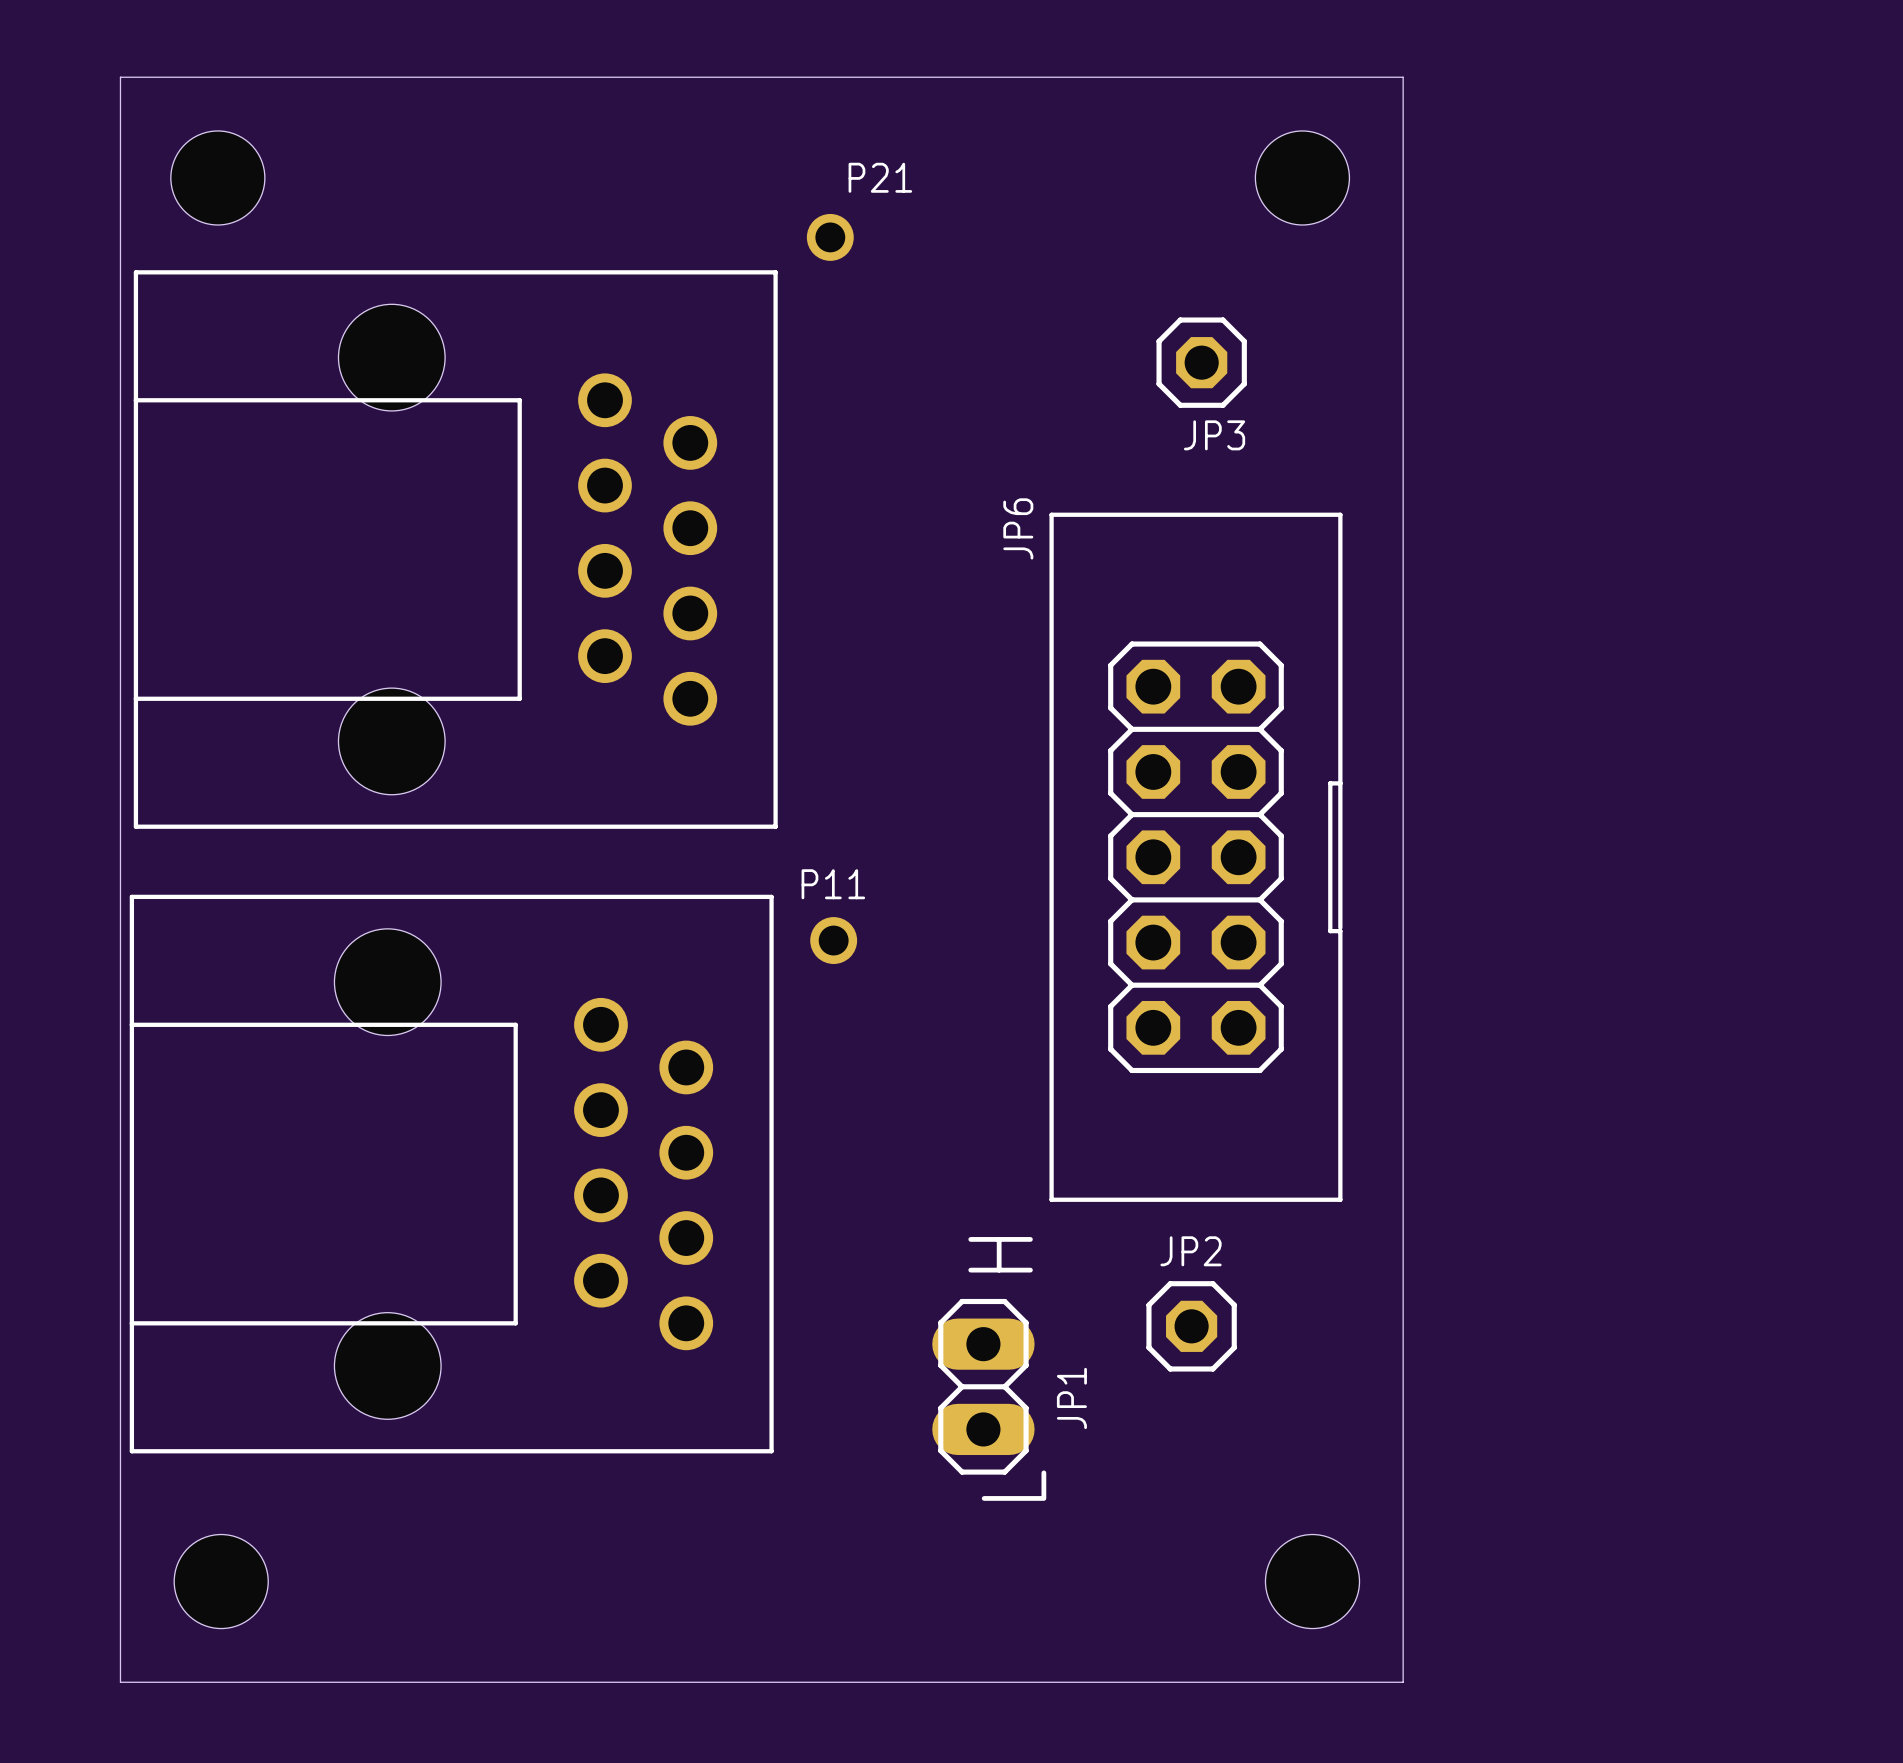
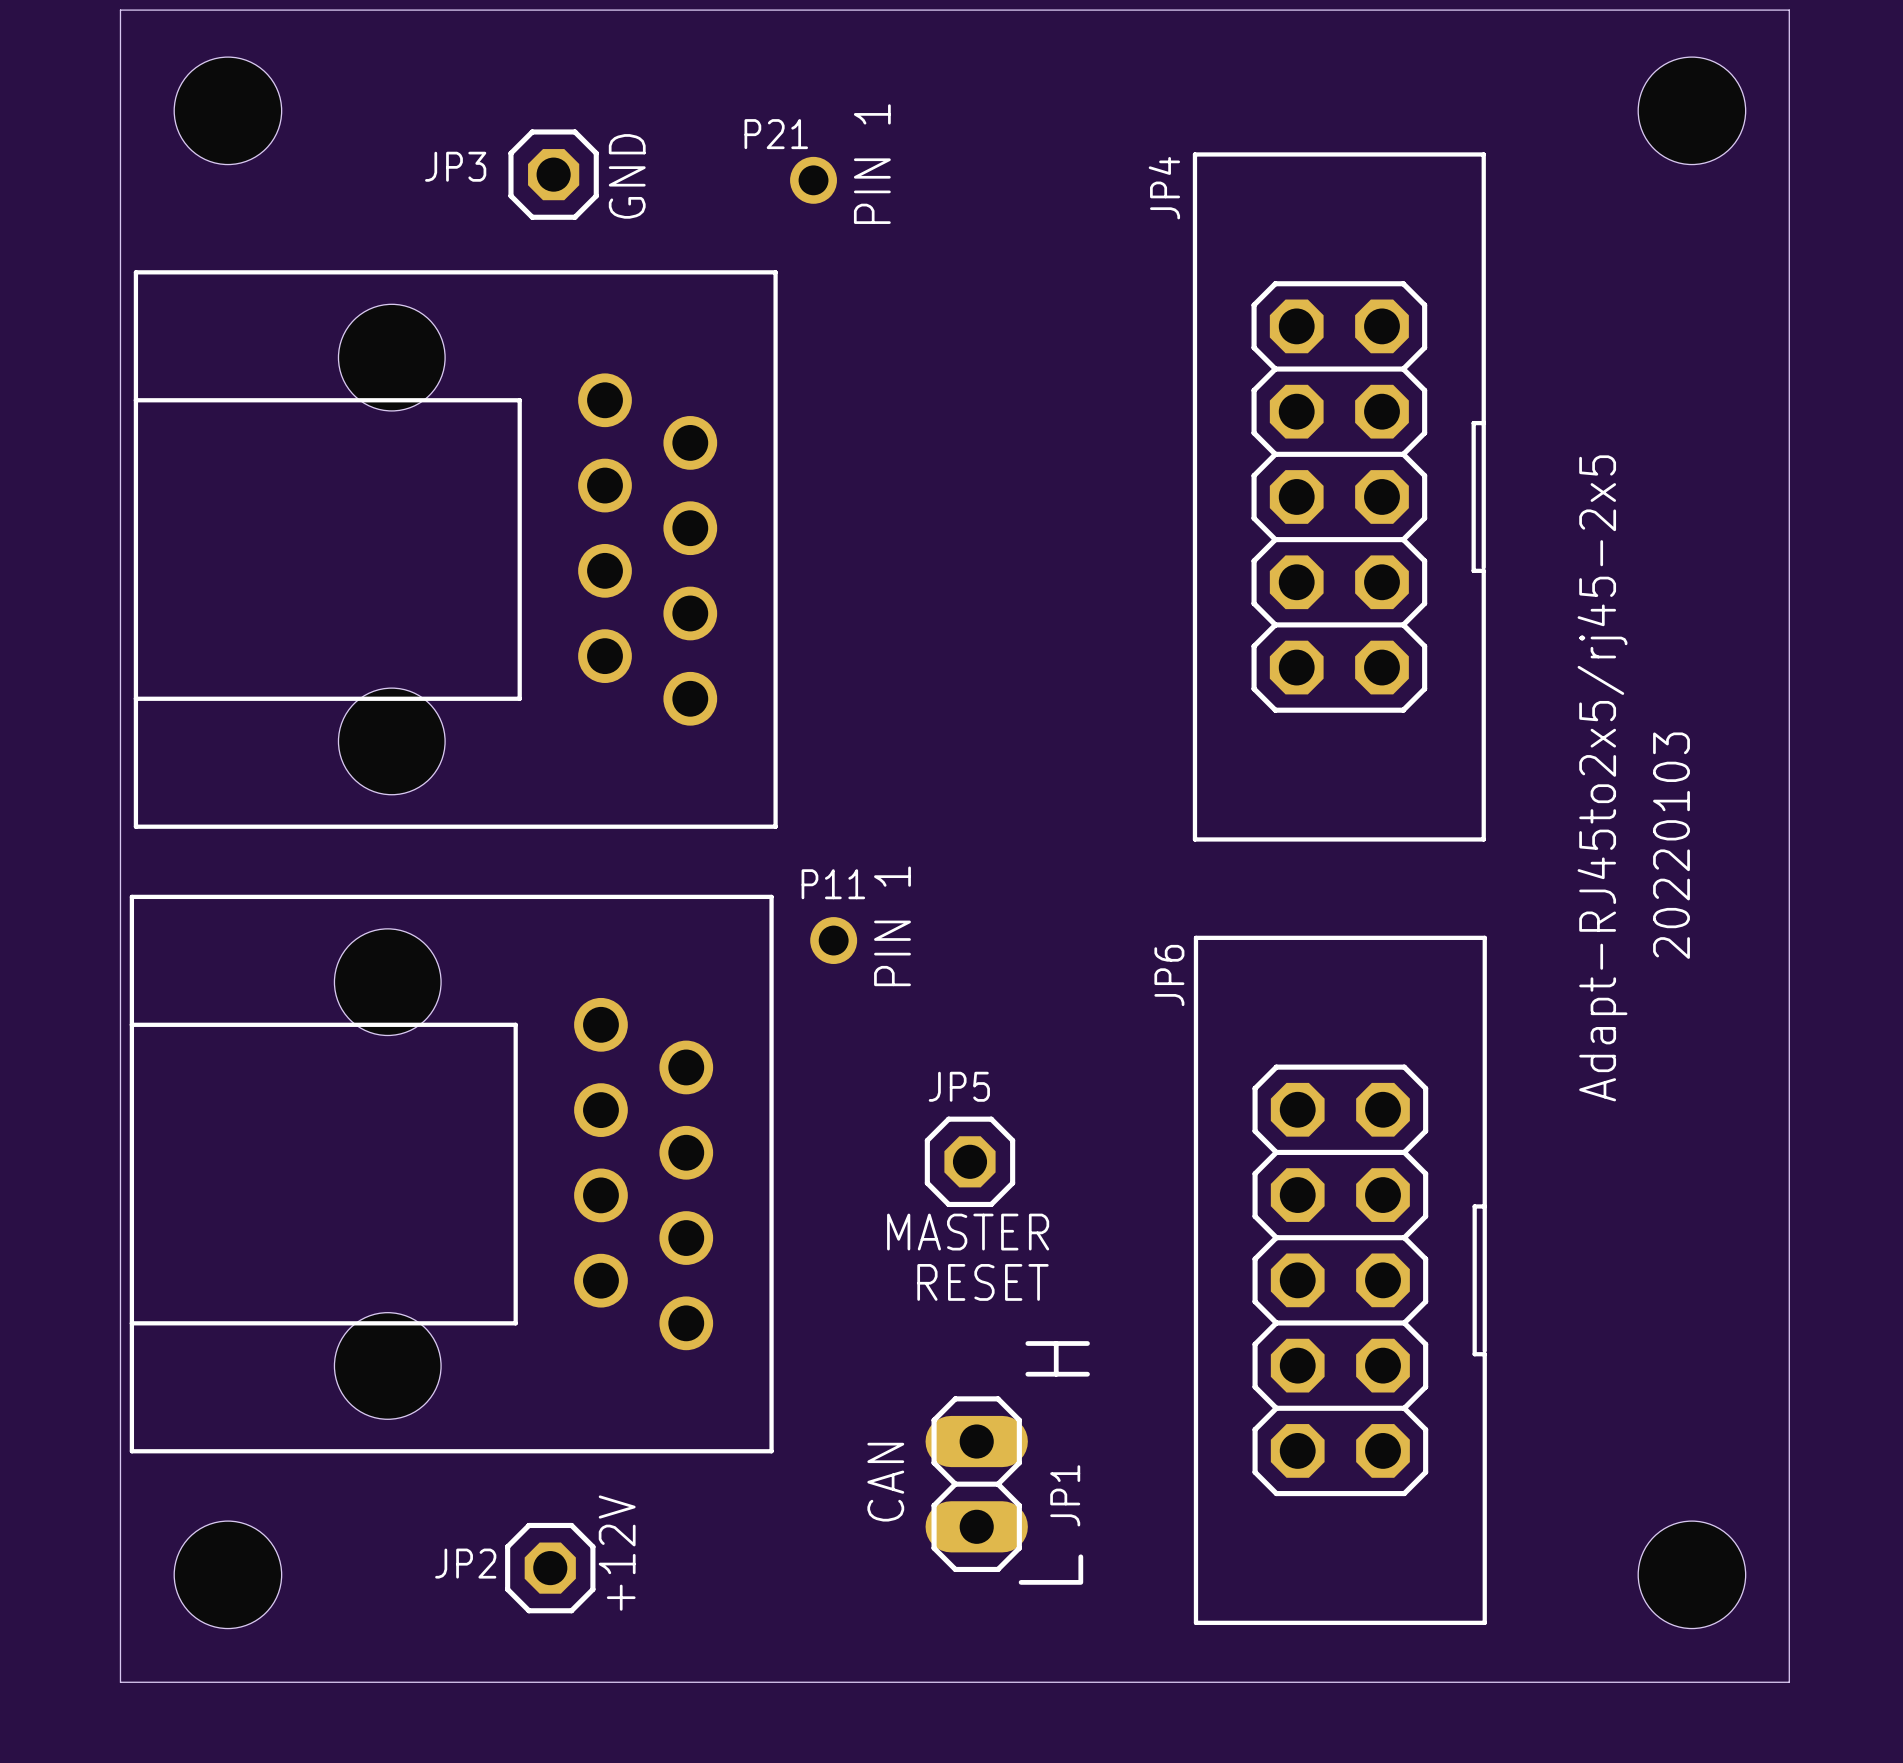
board edge: (120, 77) (1403, 77) (1403, 1682) -> (120, 77) (120, 10) (1789, 10) (1789, 1682) (1403, 1682)
hole: none -> (227, 110)
hole: none -> (1691, 110)
text: none -> PIN 1 (872, 164)
text: none -> GND (627, 176)
hole: (217, 177) -> none
P21 name position: P21 (880, 177) -> P21 (776, 134)
hole: (1302, 177) -> none
P21 position: (830, 237) -> (813, 180)
JP3 position: (1201, 362) -> (553, 174)
JP3 name position: JP3 (1214, 435) -> JP3 (455, 166)
JP4: none -> (1339, 496)
JP6 name position: JP6 (1018, 528) -> JP6 (1169, 975)
text: none -> Adapt-RJ45to2x5/rj45-2x5 (1602, 778)
text: none -> 20220103 (1671, 845)
JP6 position: (1195, 857) -> (1340, 1280)
text: none -> PIN 1 (892, 926)
JP5: none -> (970, 1161)
text: none -> MASTER (968, 1232)
JP2 name position: JP2 (1191, 1251) -> JP2 (465, 1563)
text position: H (1000, 1254) -> H (1057, 1358)
text: none -> RESET (982, 1282)
JP2 position: (1191, 1326) -> (550, 1568)
JP1 position: (983, 1386) -> (976, 1484)
text: none -> CAN (885, 1482)
text position: L (1014, 1485) -> L (1050, 1569)
hole size: [174, 1534, 269, 1629] -> [174, 1521, 282, 1629]
text: none -> +12V (617, 1553)
hole: none -> (1691, 1574)
hole: (1312, 1581) -> none

